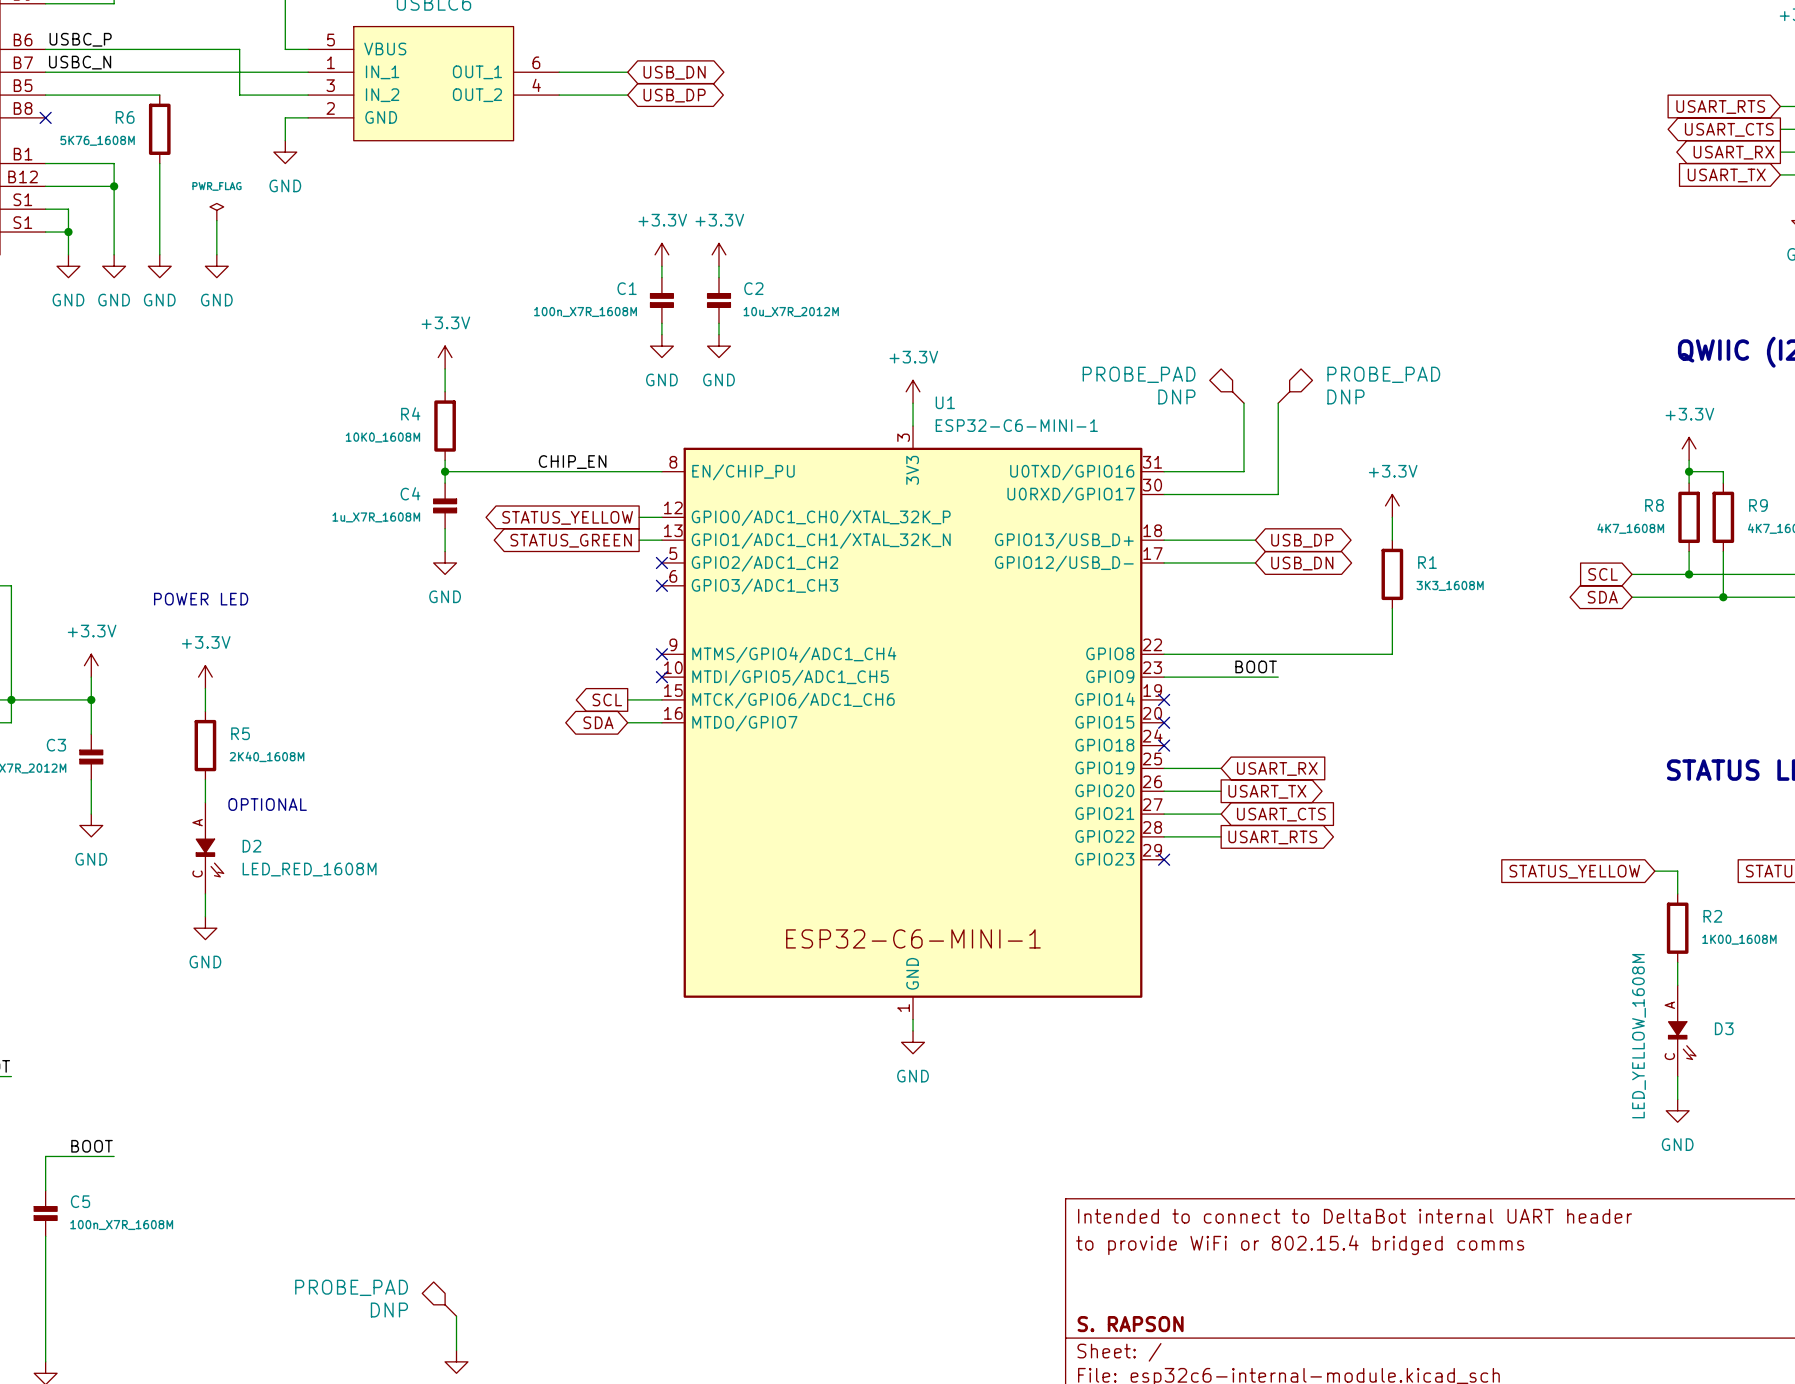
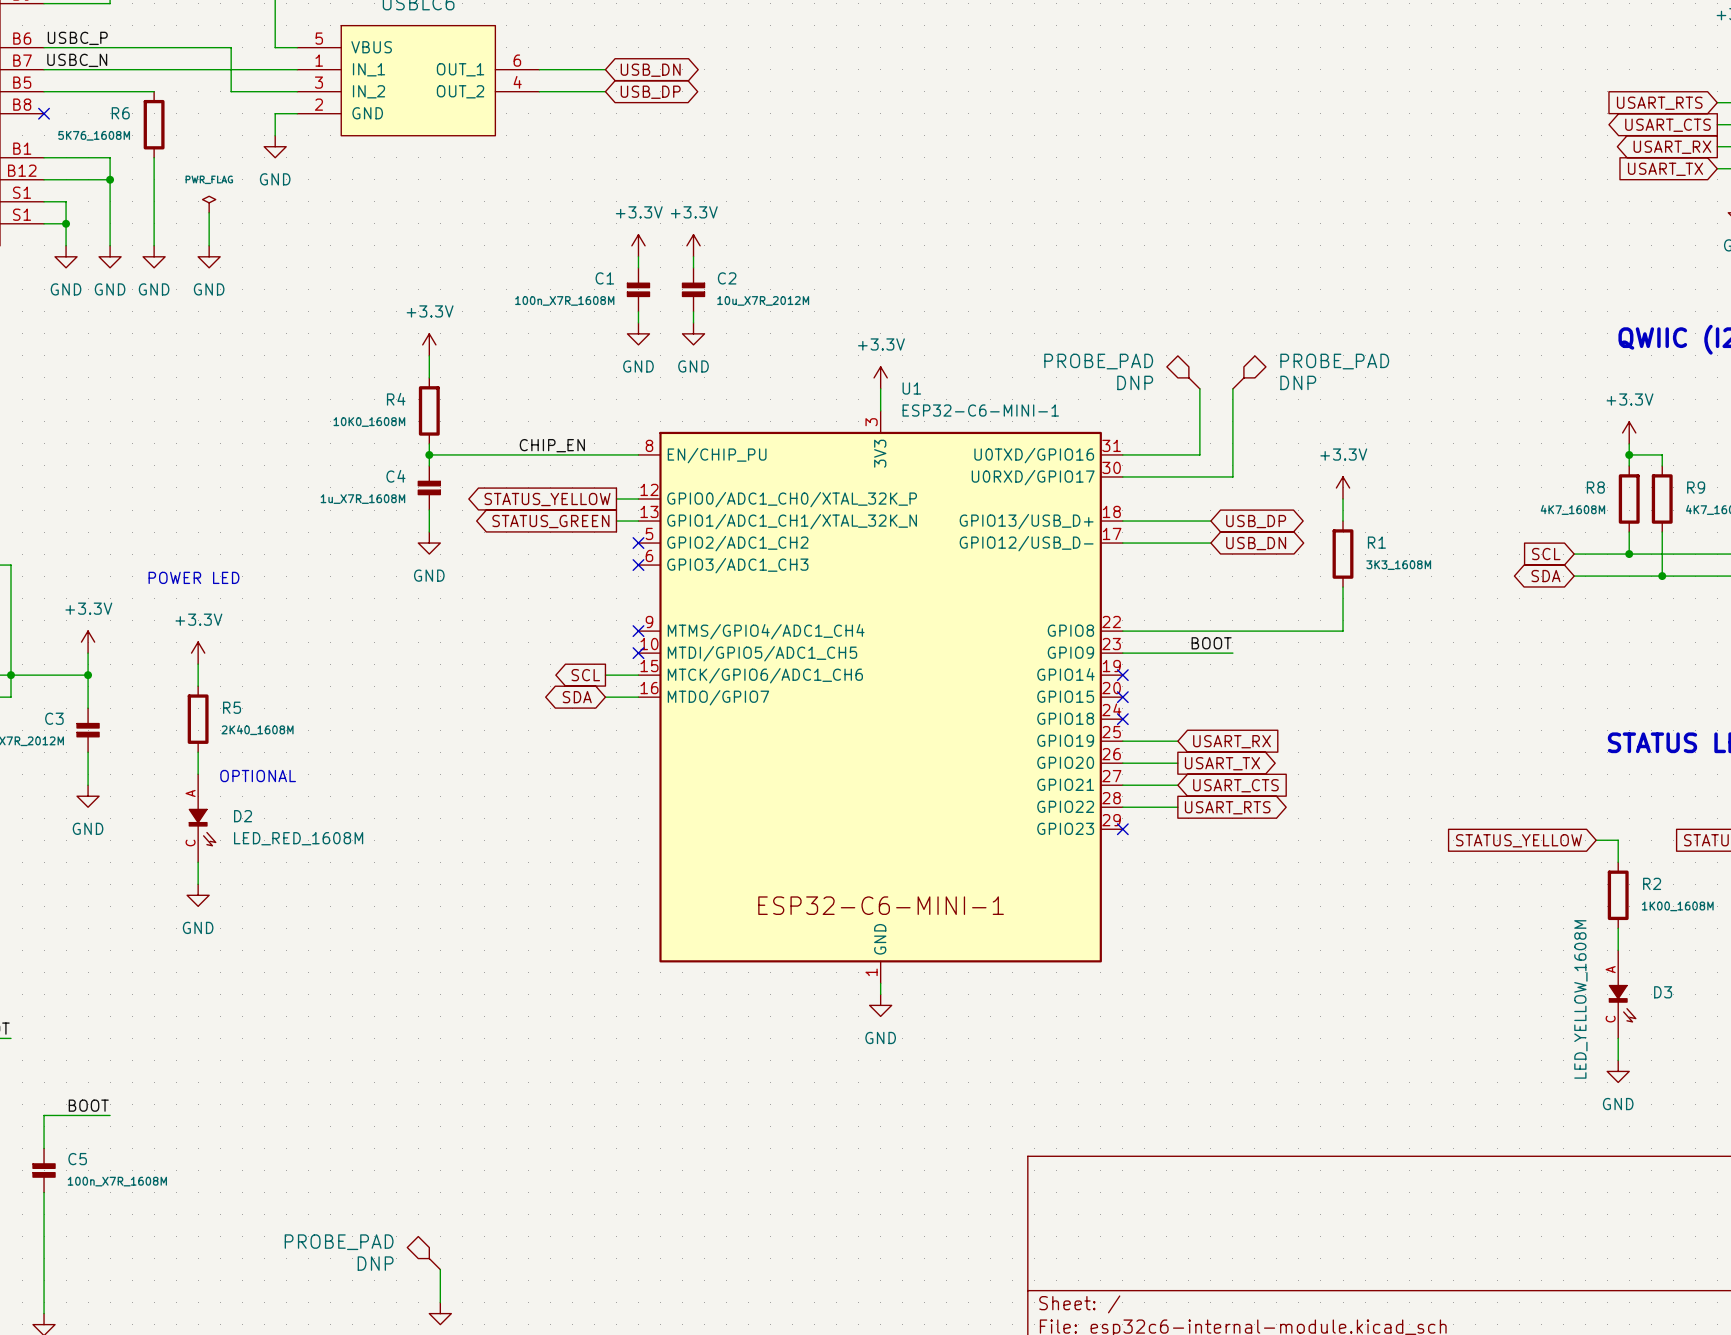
title block: Intended to connect to DeltaBot internal UART header (1355, 1216) -> none
title block: to provide WiFi or 802.15.4 bridged comms (1300, 1245) -> none
title block: S. RAPSON (1130, 1324) -> none

